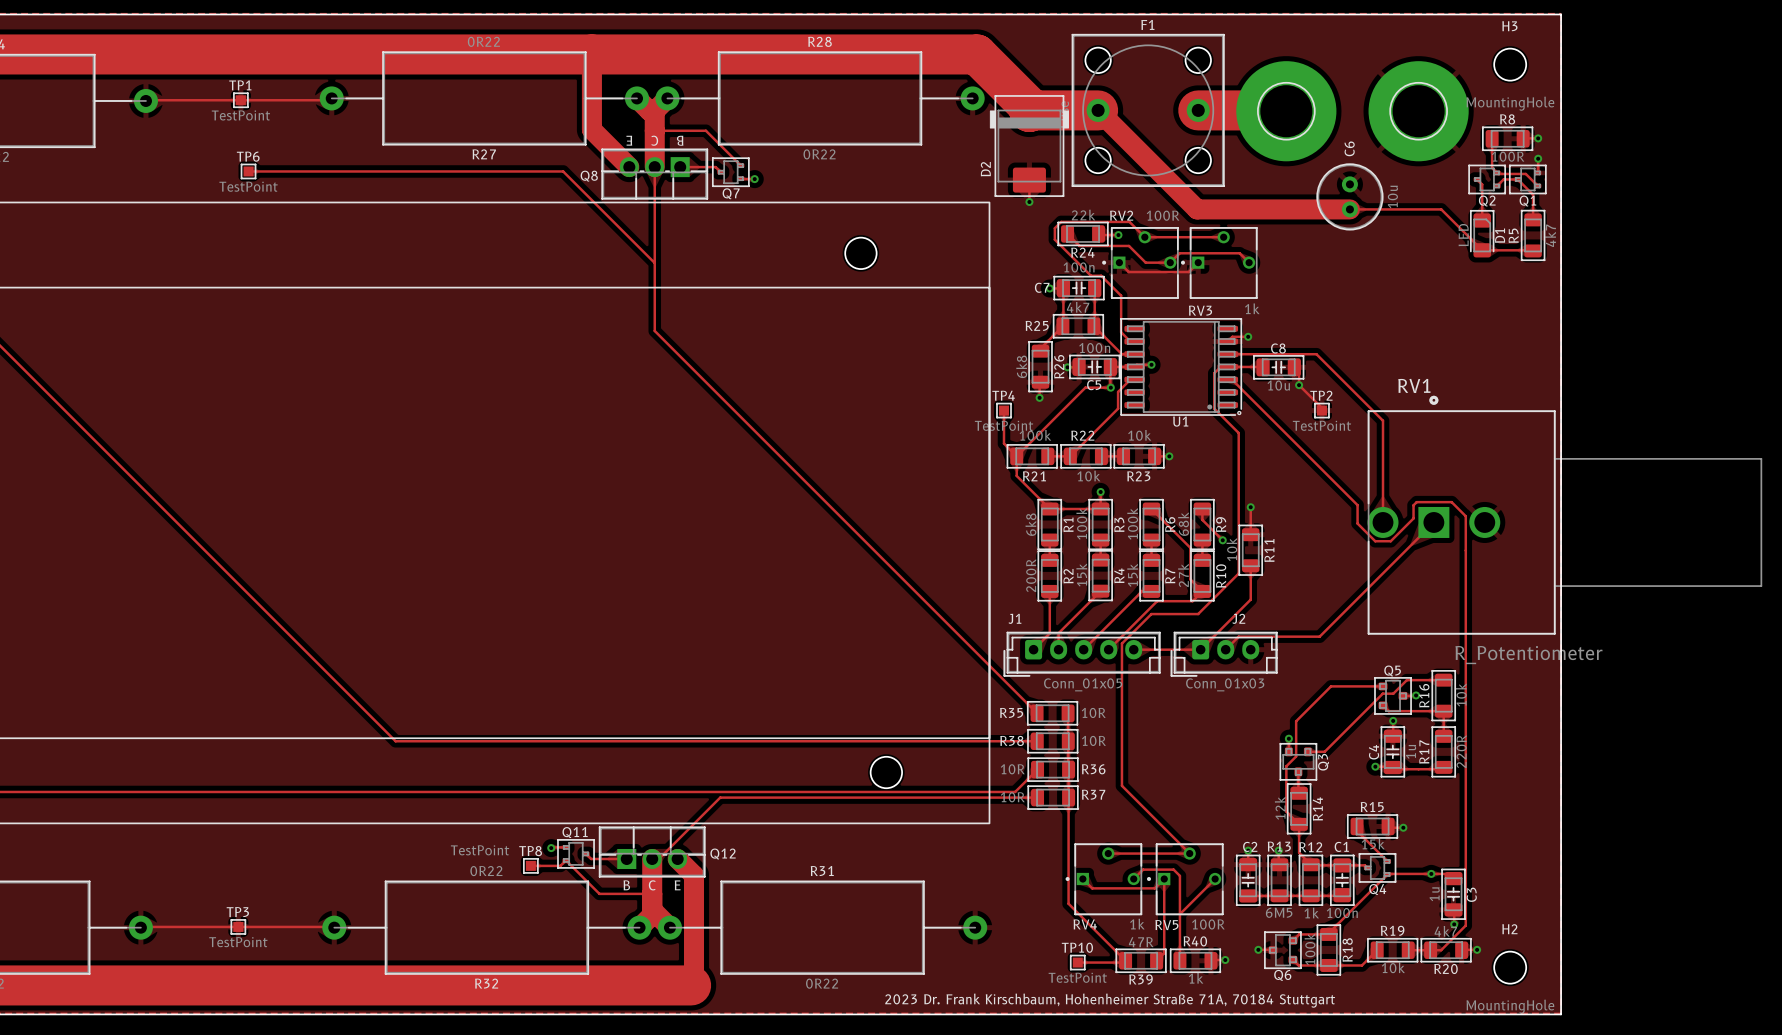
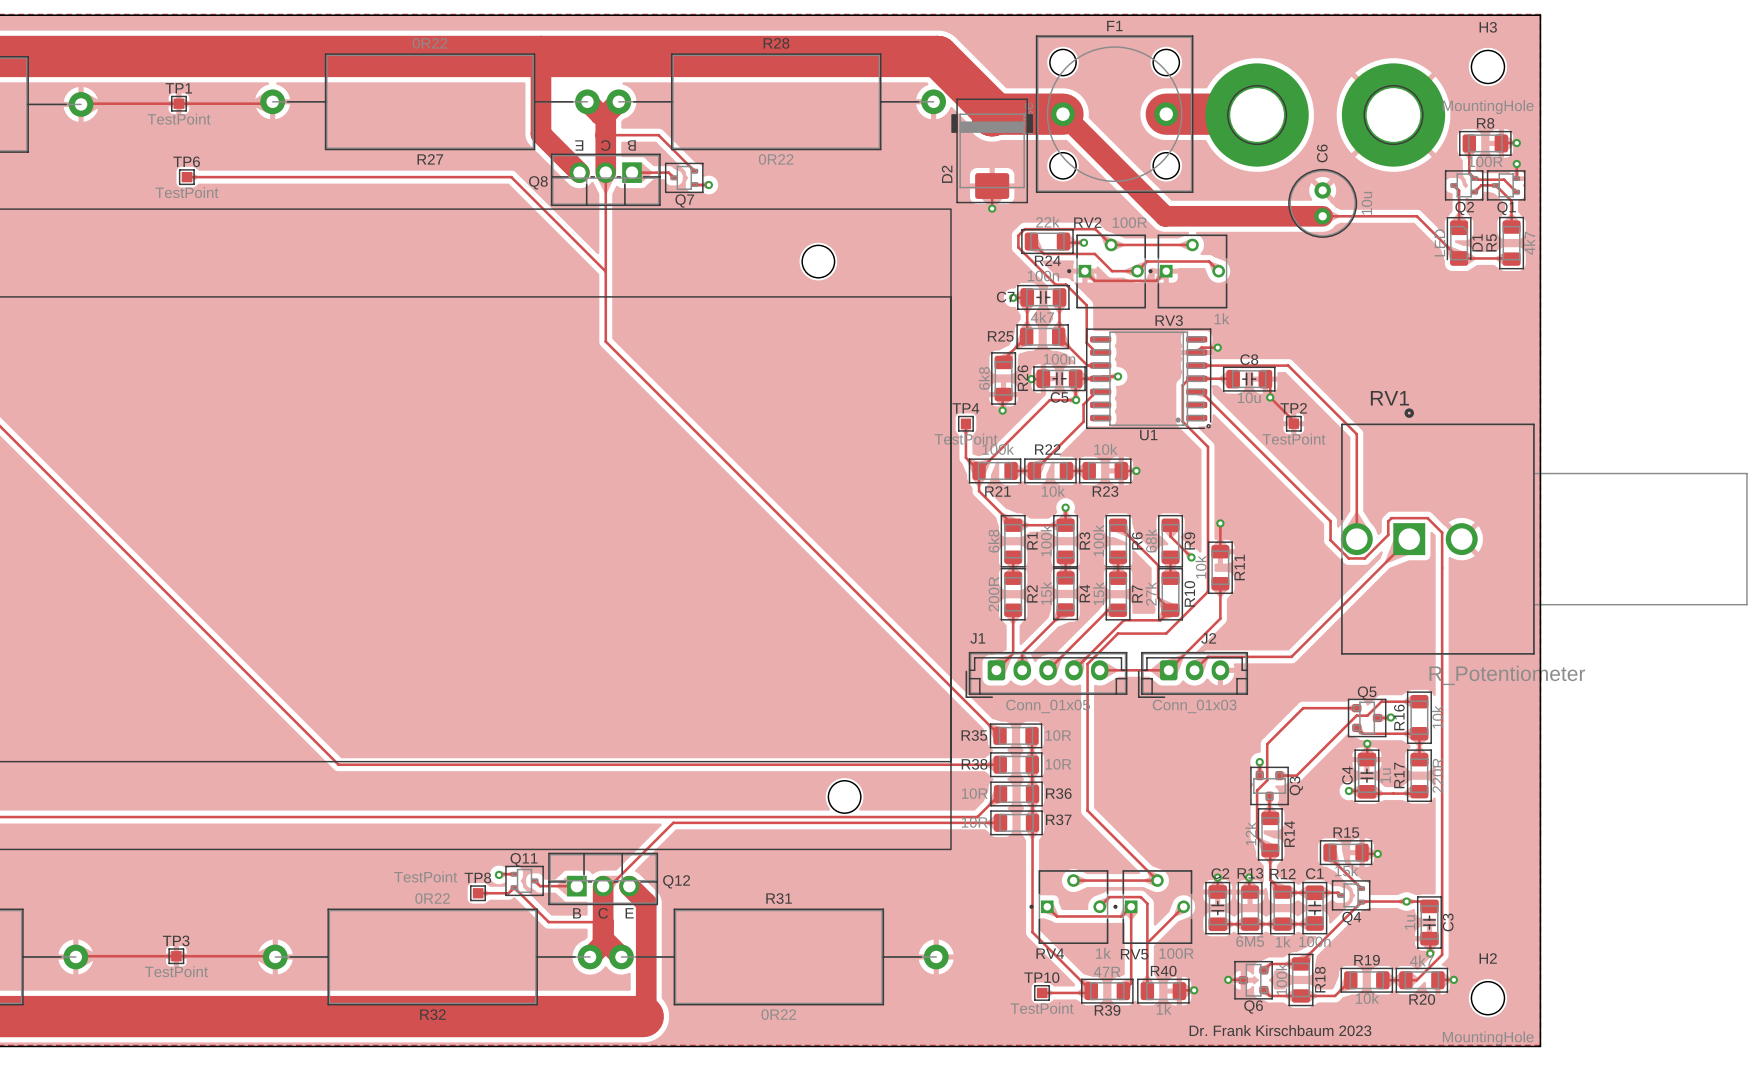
text: none -> Dr. Frank Kirschbaum 2023 (1280, 1030)
text: 2023 Dr. Frank Kirschbaum, Hohenheimer Straße 71A, 70184 Stuttgart (1110, 1000) -> none

